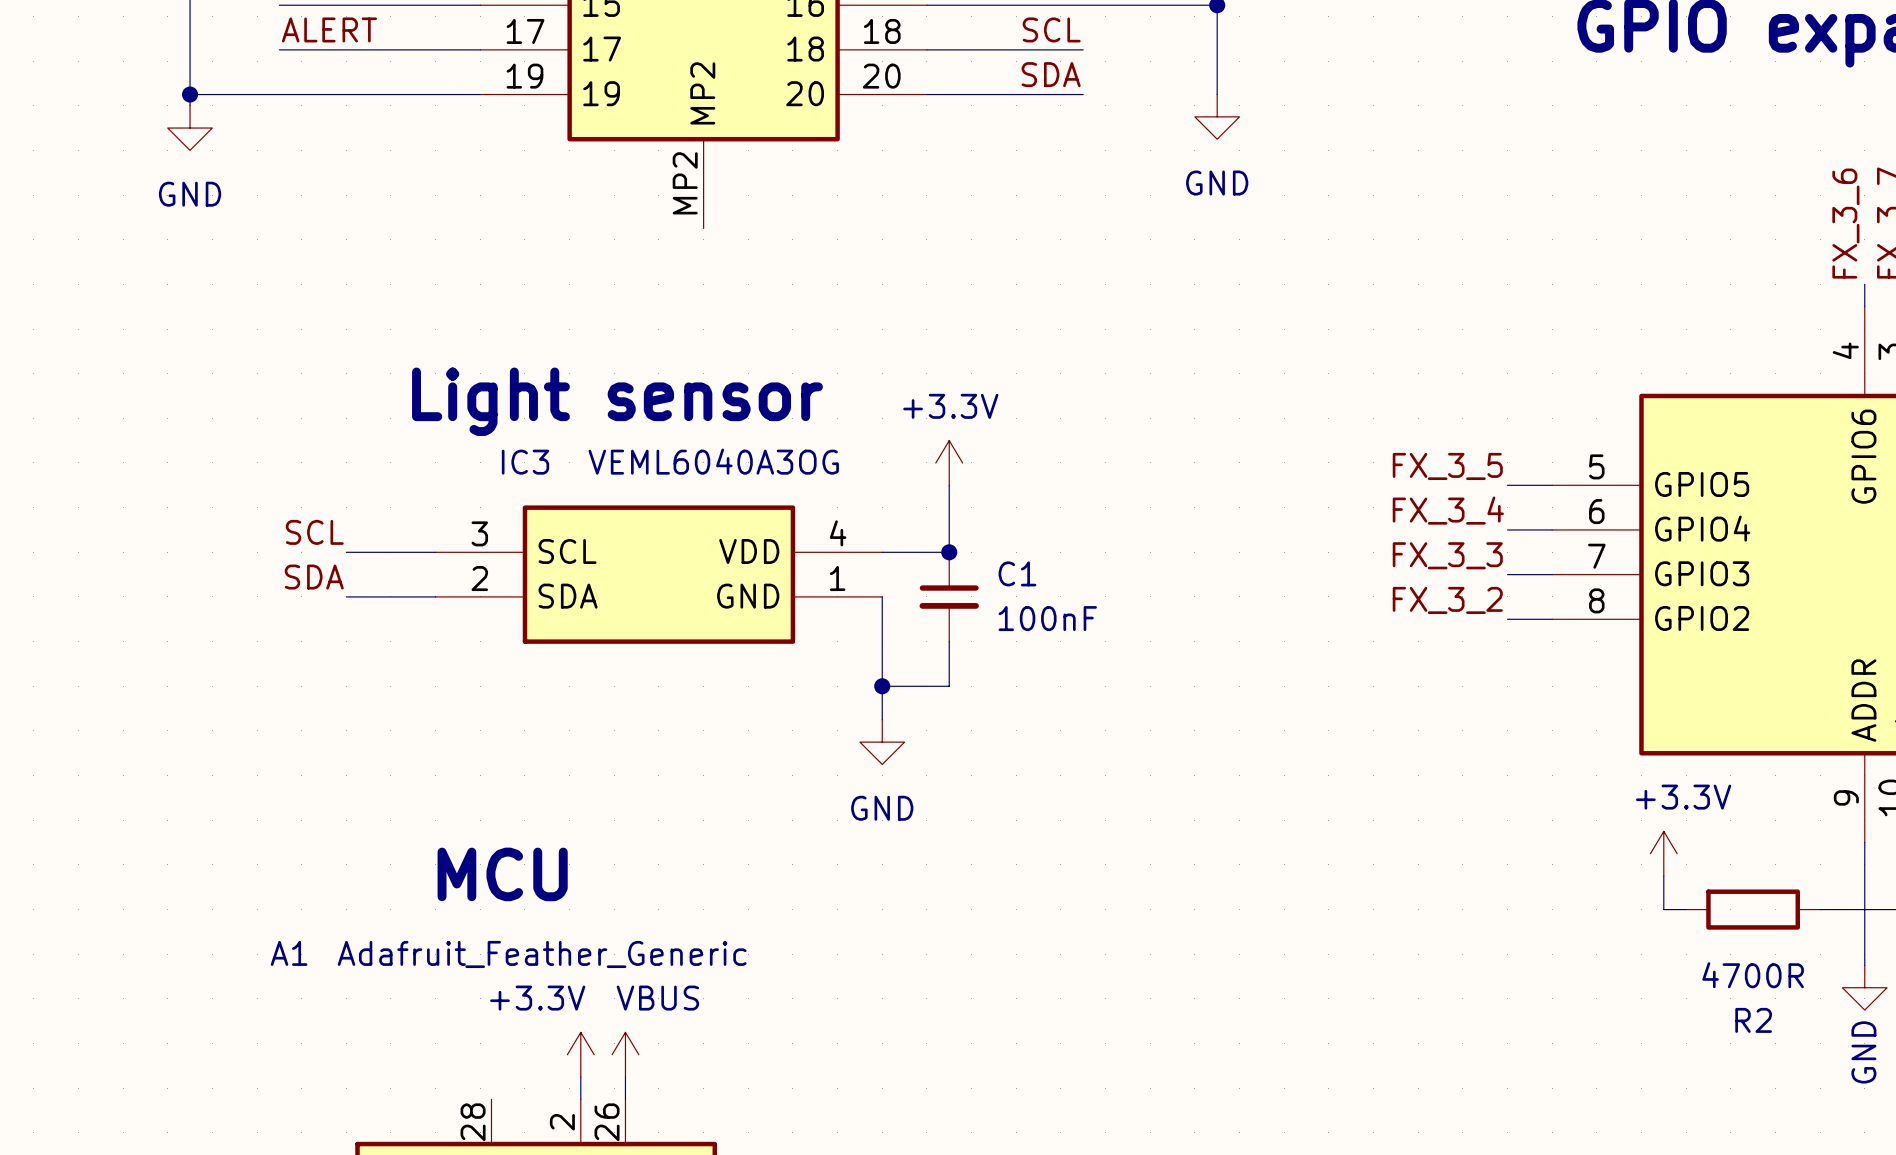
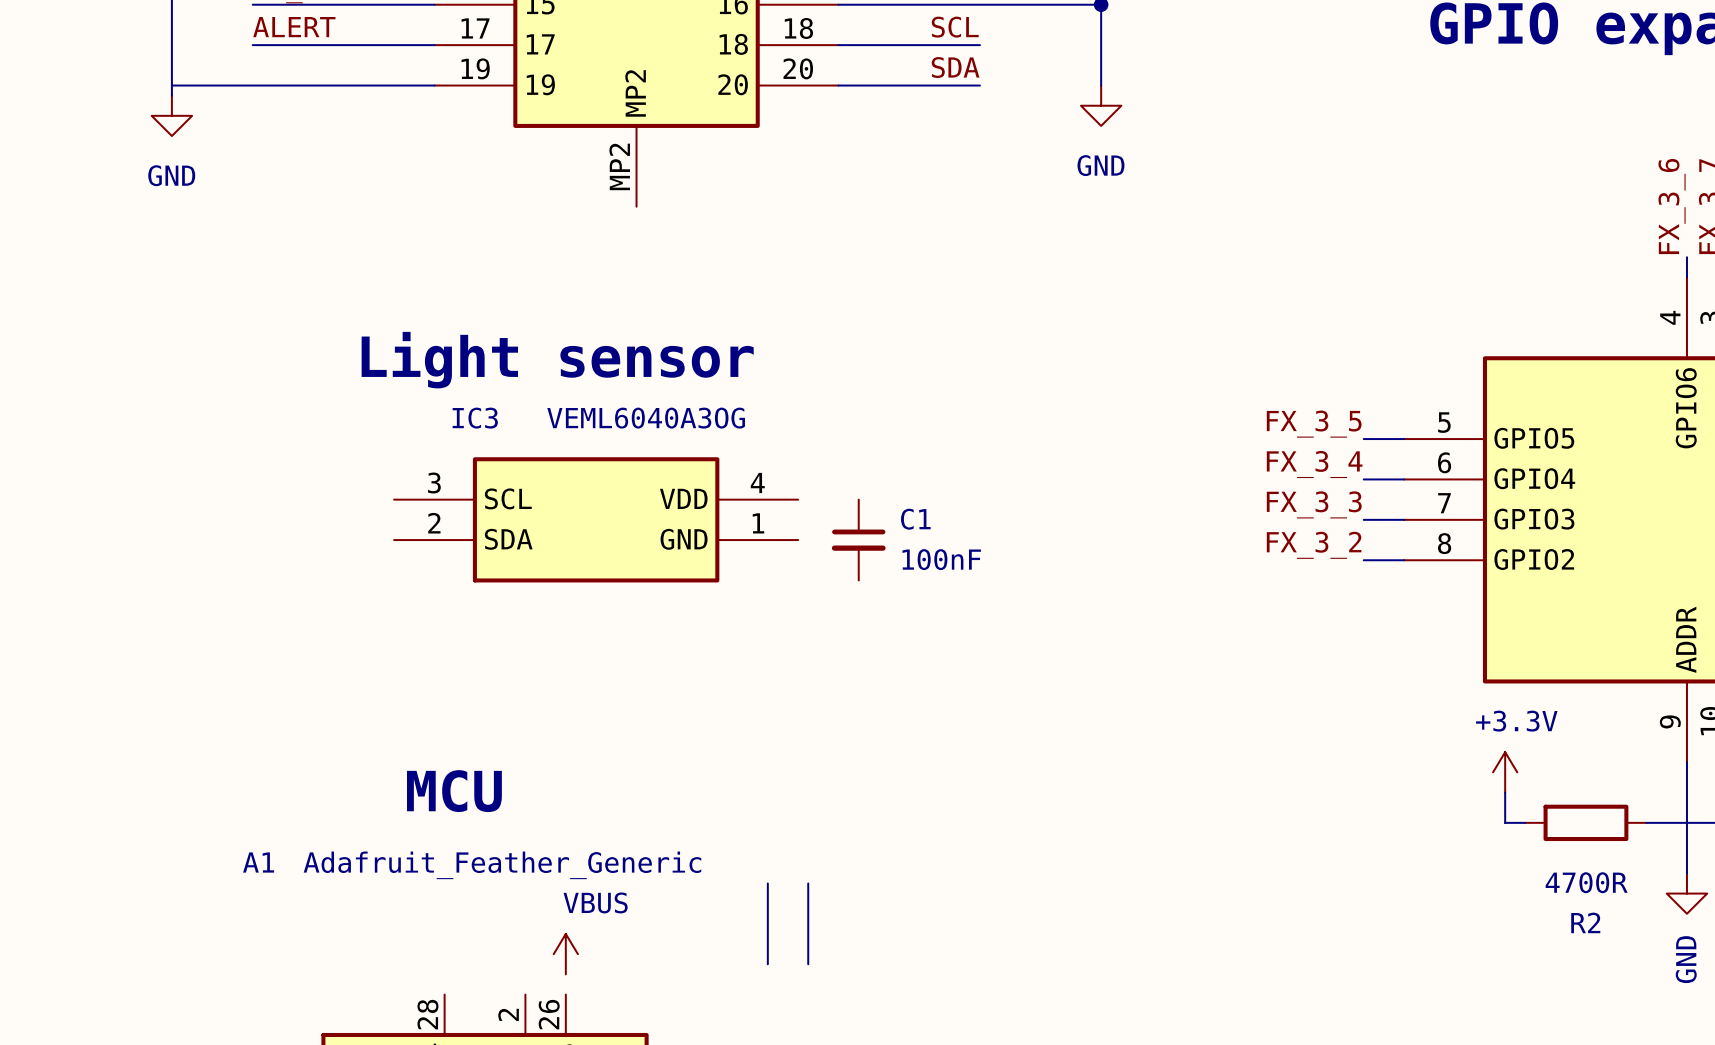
junction: (190, 94) -> none
power symbol: +3.3V (949, 462) -> none
wire: (949, 485) (949, 552) (882, 552) -> none
label: SCL (314, 532) -> none
wire: (346, 552) (435, 552) -> none
junction: (949, 552) -> none
label: SDA (314, 577) -> none
wire: (346, 596) (435, 596) -> none
wire: (882, 596) (882, 719) -> none
wire: (949, 641) (949, 686) (882, 686) -> none
junction: (882, 686) -> none
power symbol: GND (882, 742) -> none
wire: none -> (767, 883) (767, 964)
wire: none -> (808, 883) (808, 964)
power symbol: +3.3V (580, 1054) -> none
wire: (580, 1077) (580, 1099) -> none
wire: (625, 1077) (625, 1099) -> none

